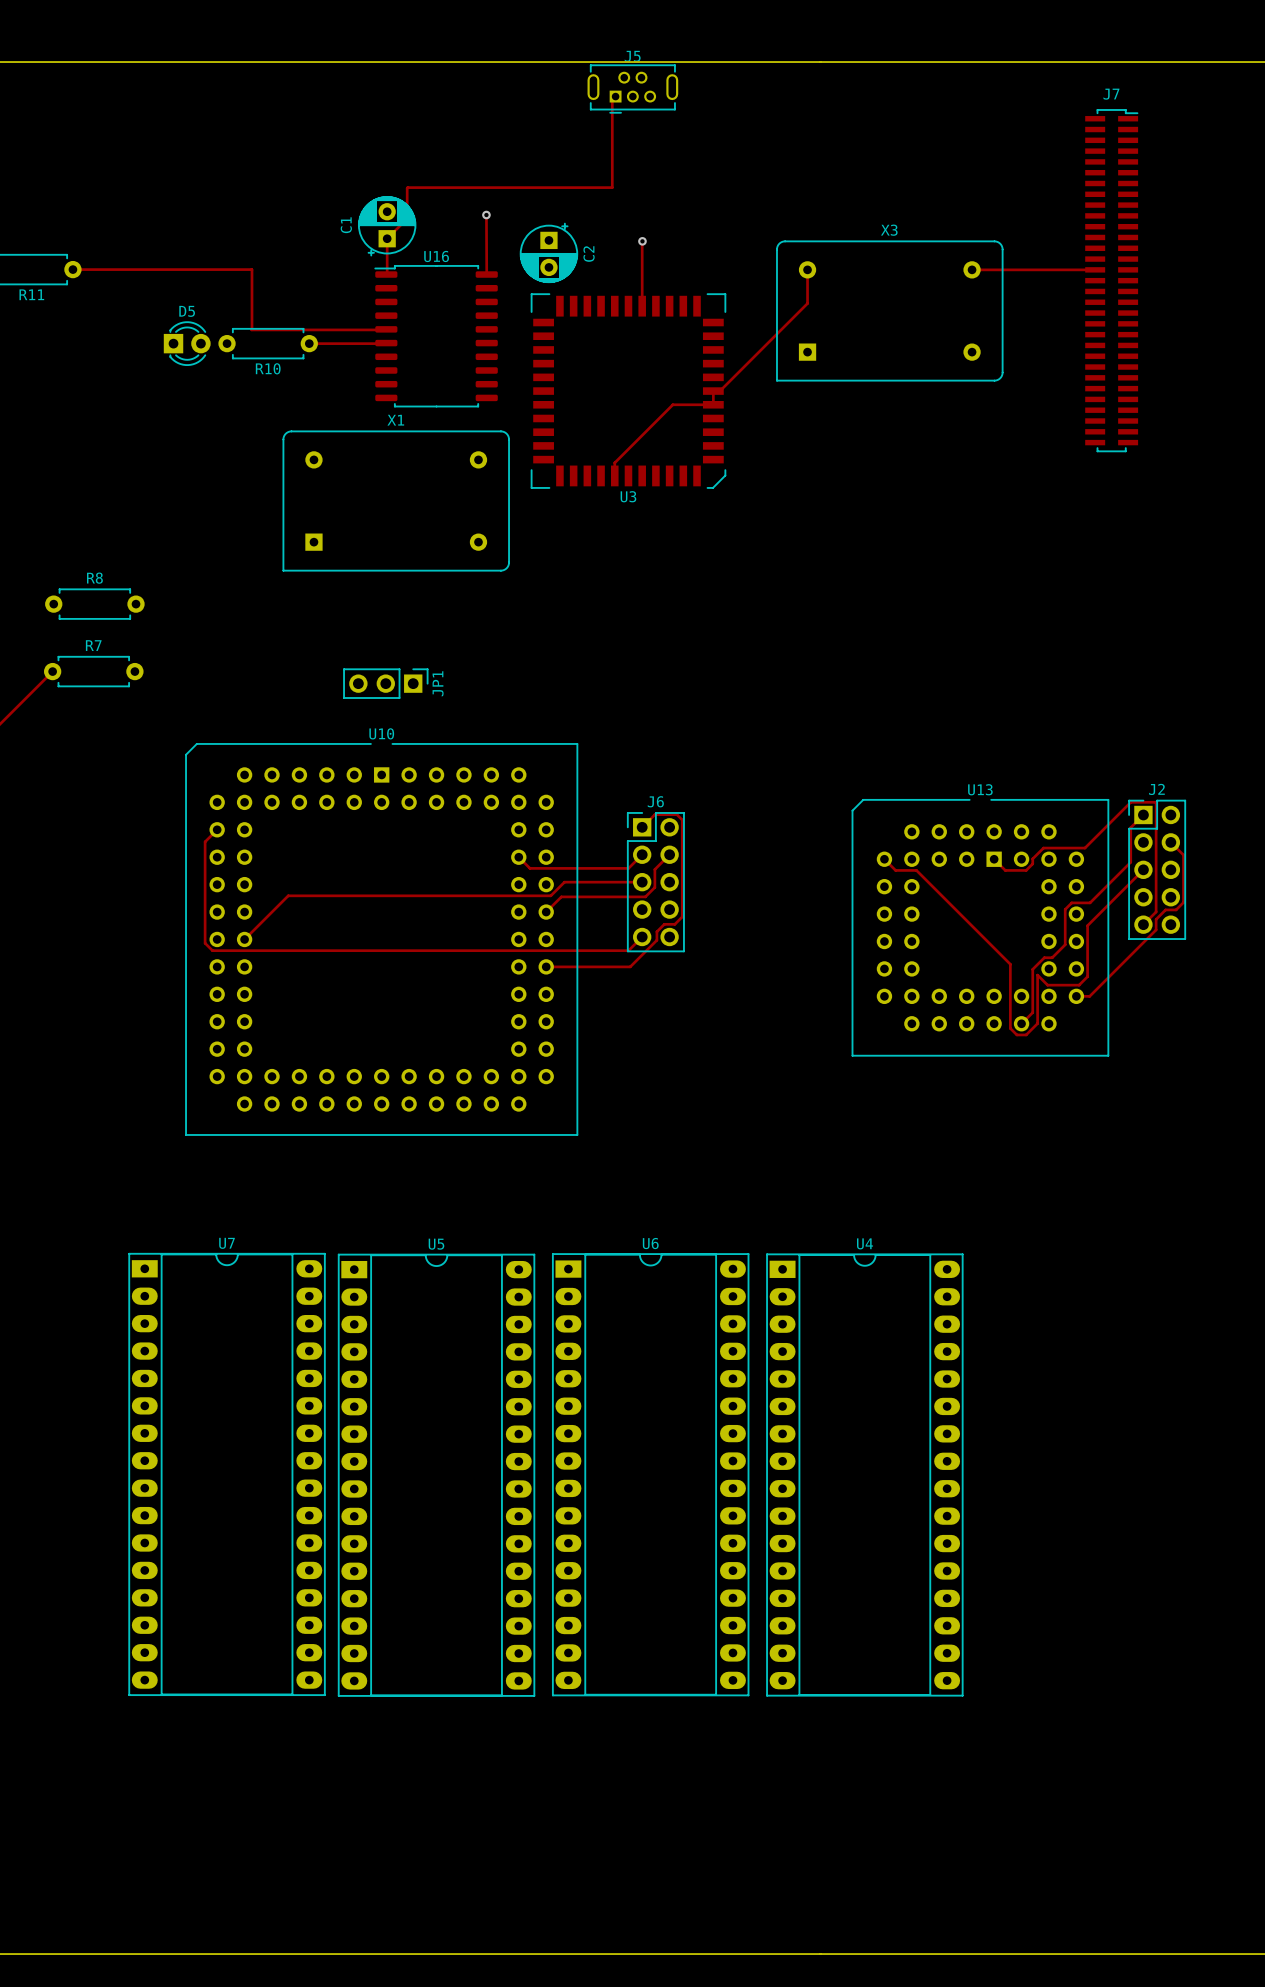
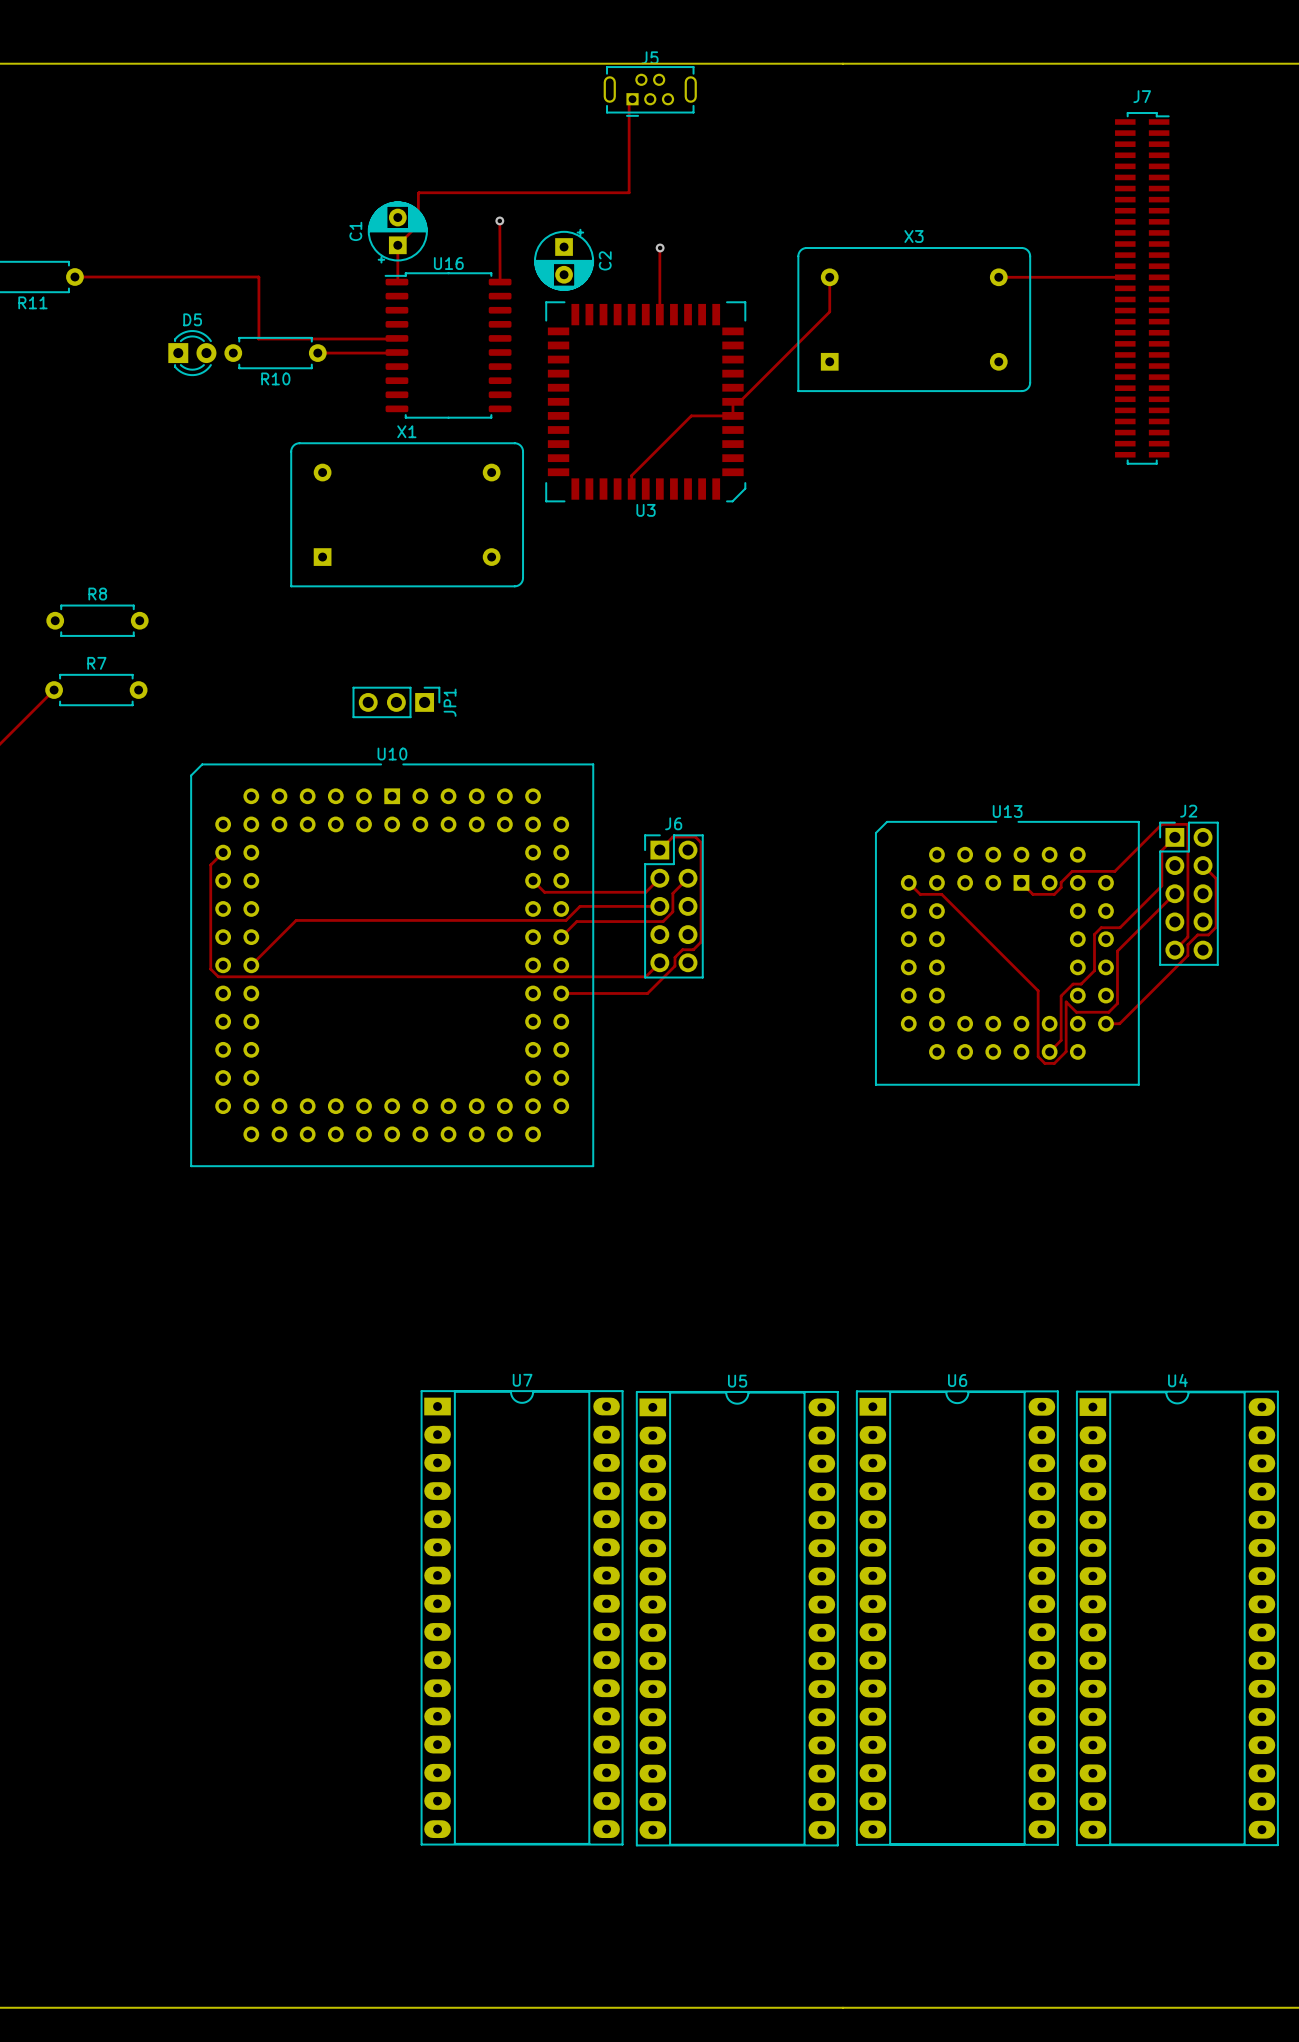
U7 position: (227, 1474) -> (522, 1617)
U6 position: (650, 1474) -> (957, 1618)
U5 position: (436, 1475) -> (737, 1618)
U4 position: (864, 1475) -> (1177, 1618)

